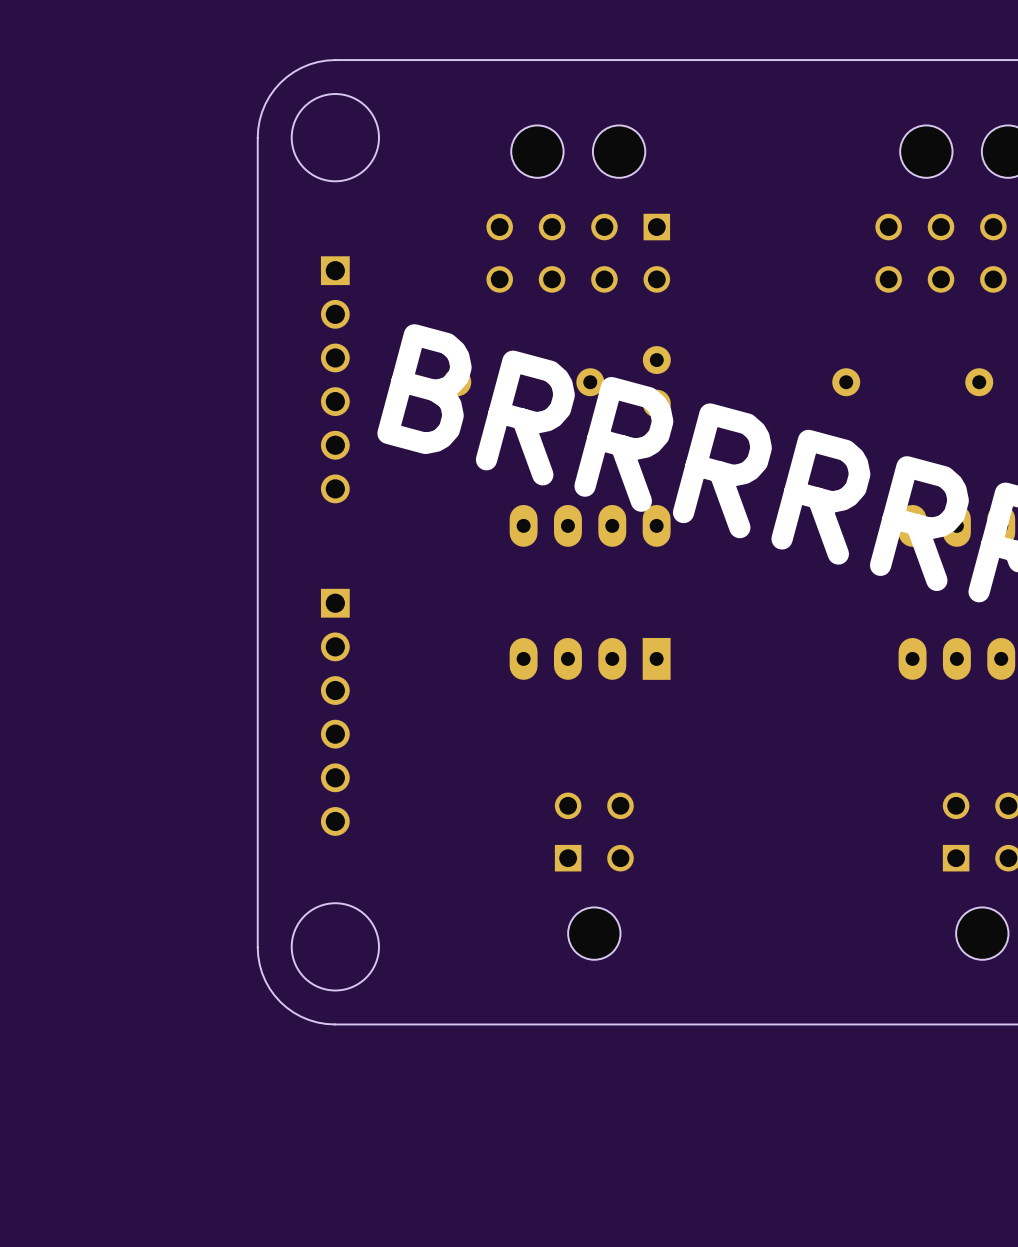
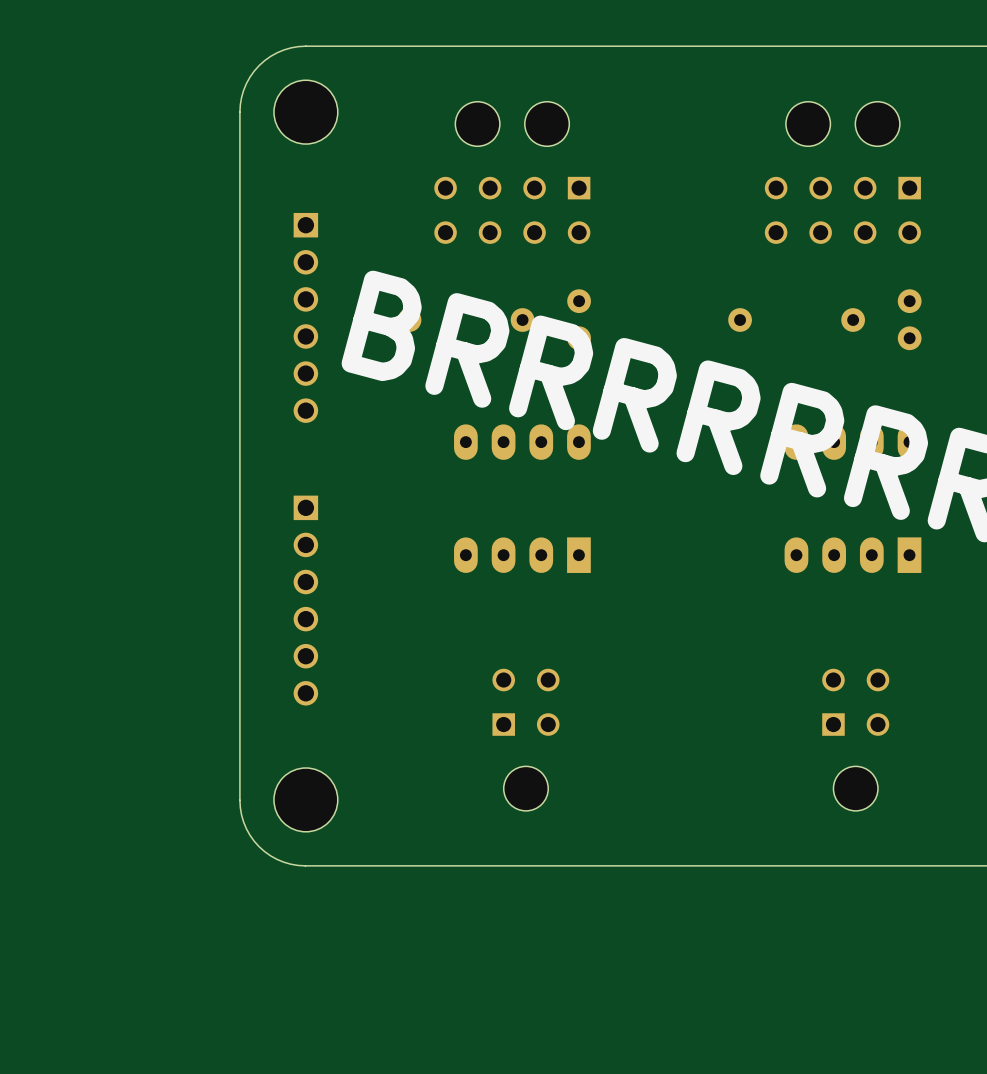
round board edge: [290, 93, 380, 183] -> none
part: none -> (305, 112)
round board edge: [290, 902, 380, 992] -> none
part: none -> (305, 799)

